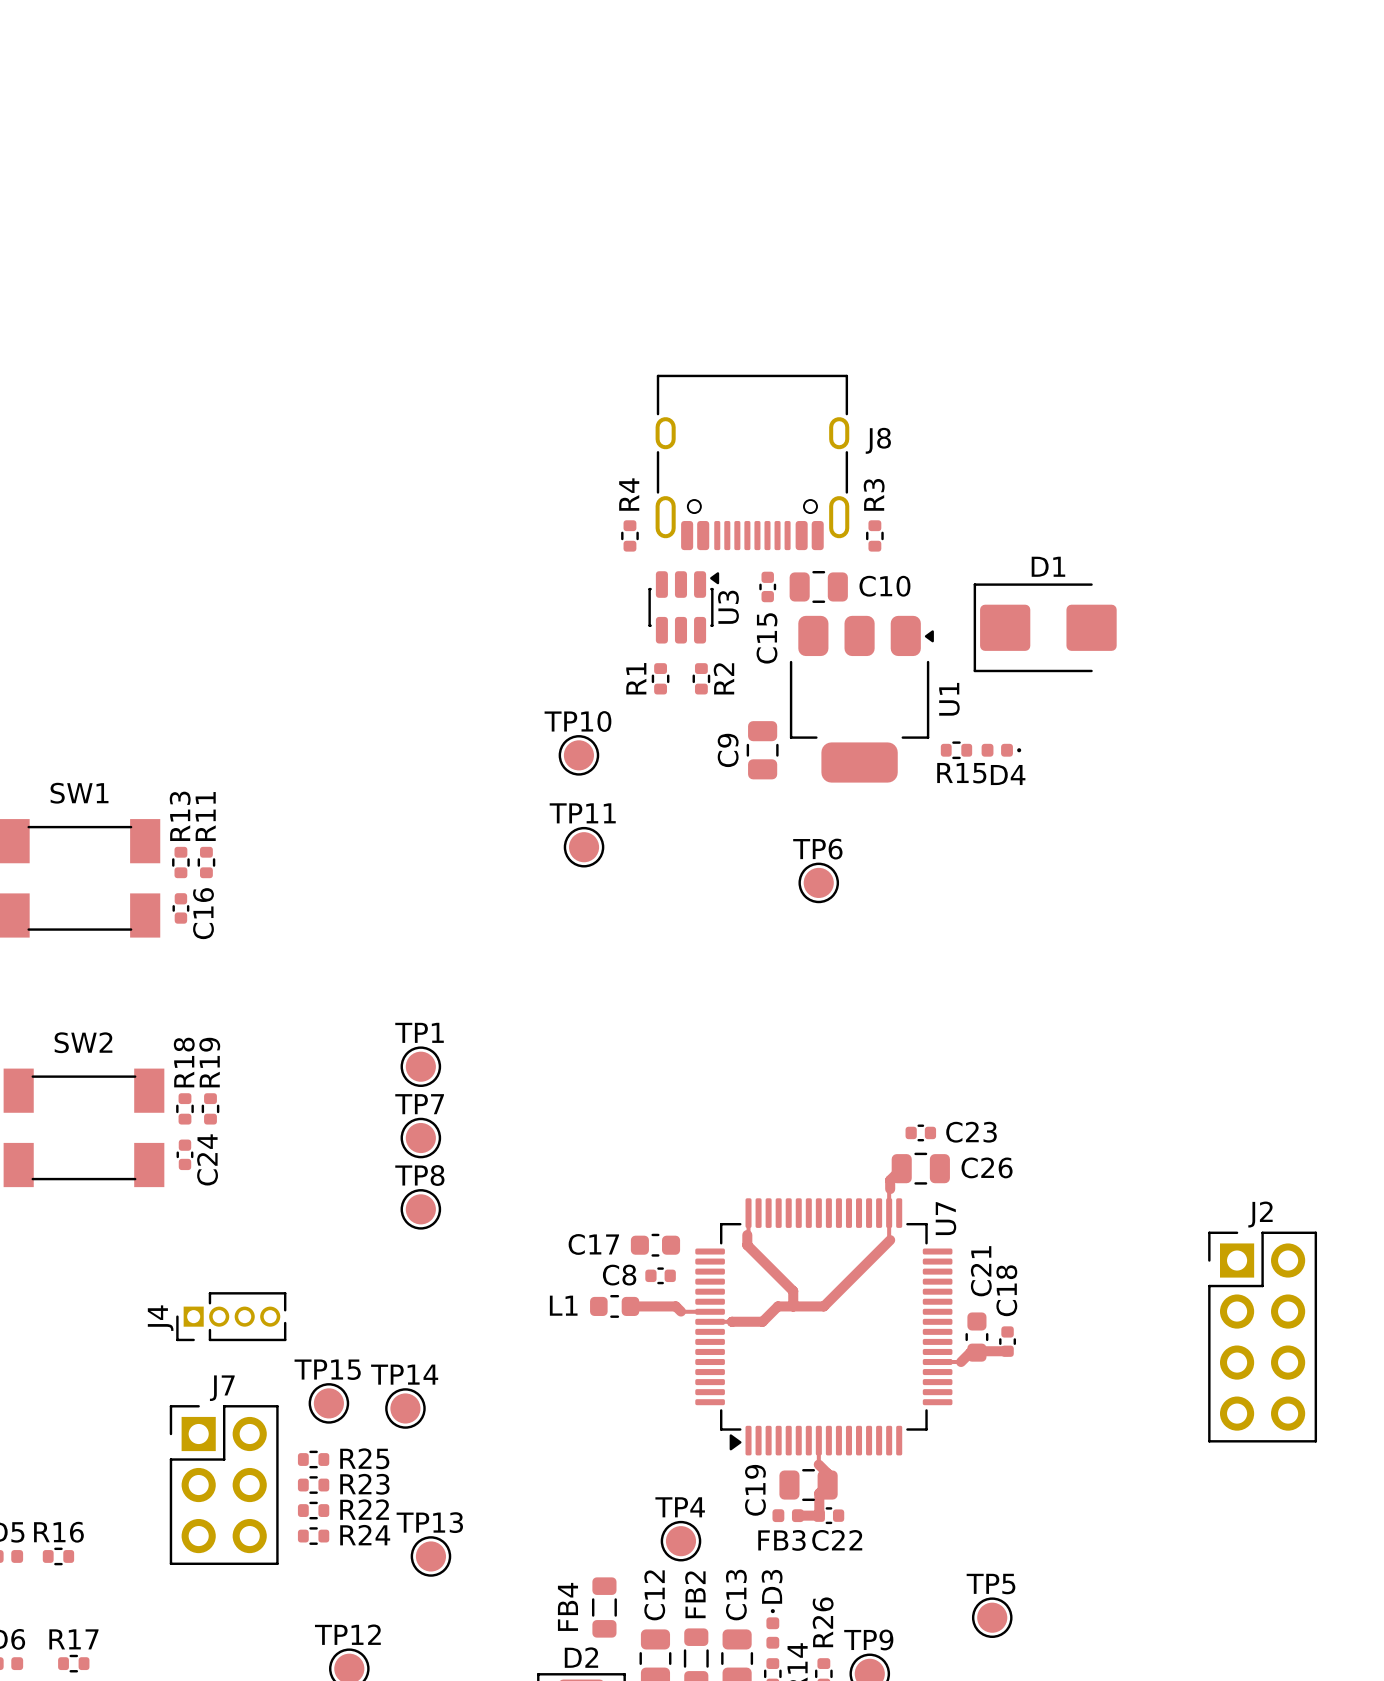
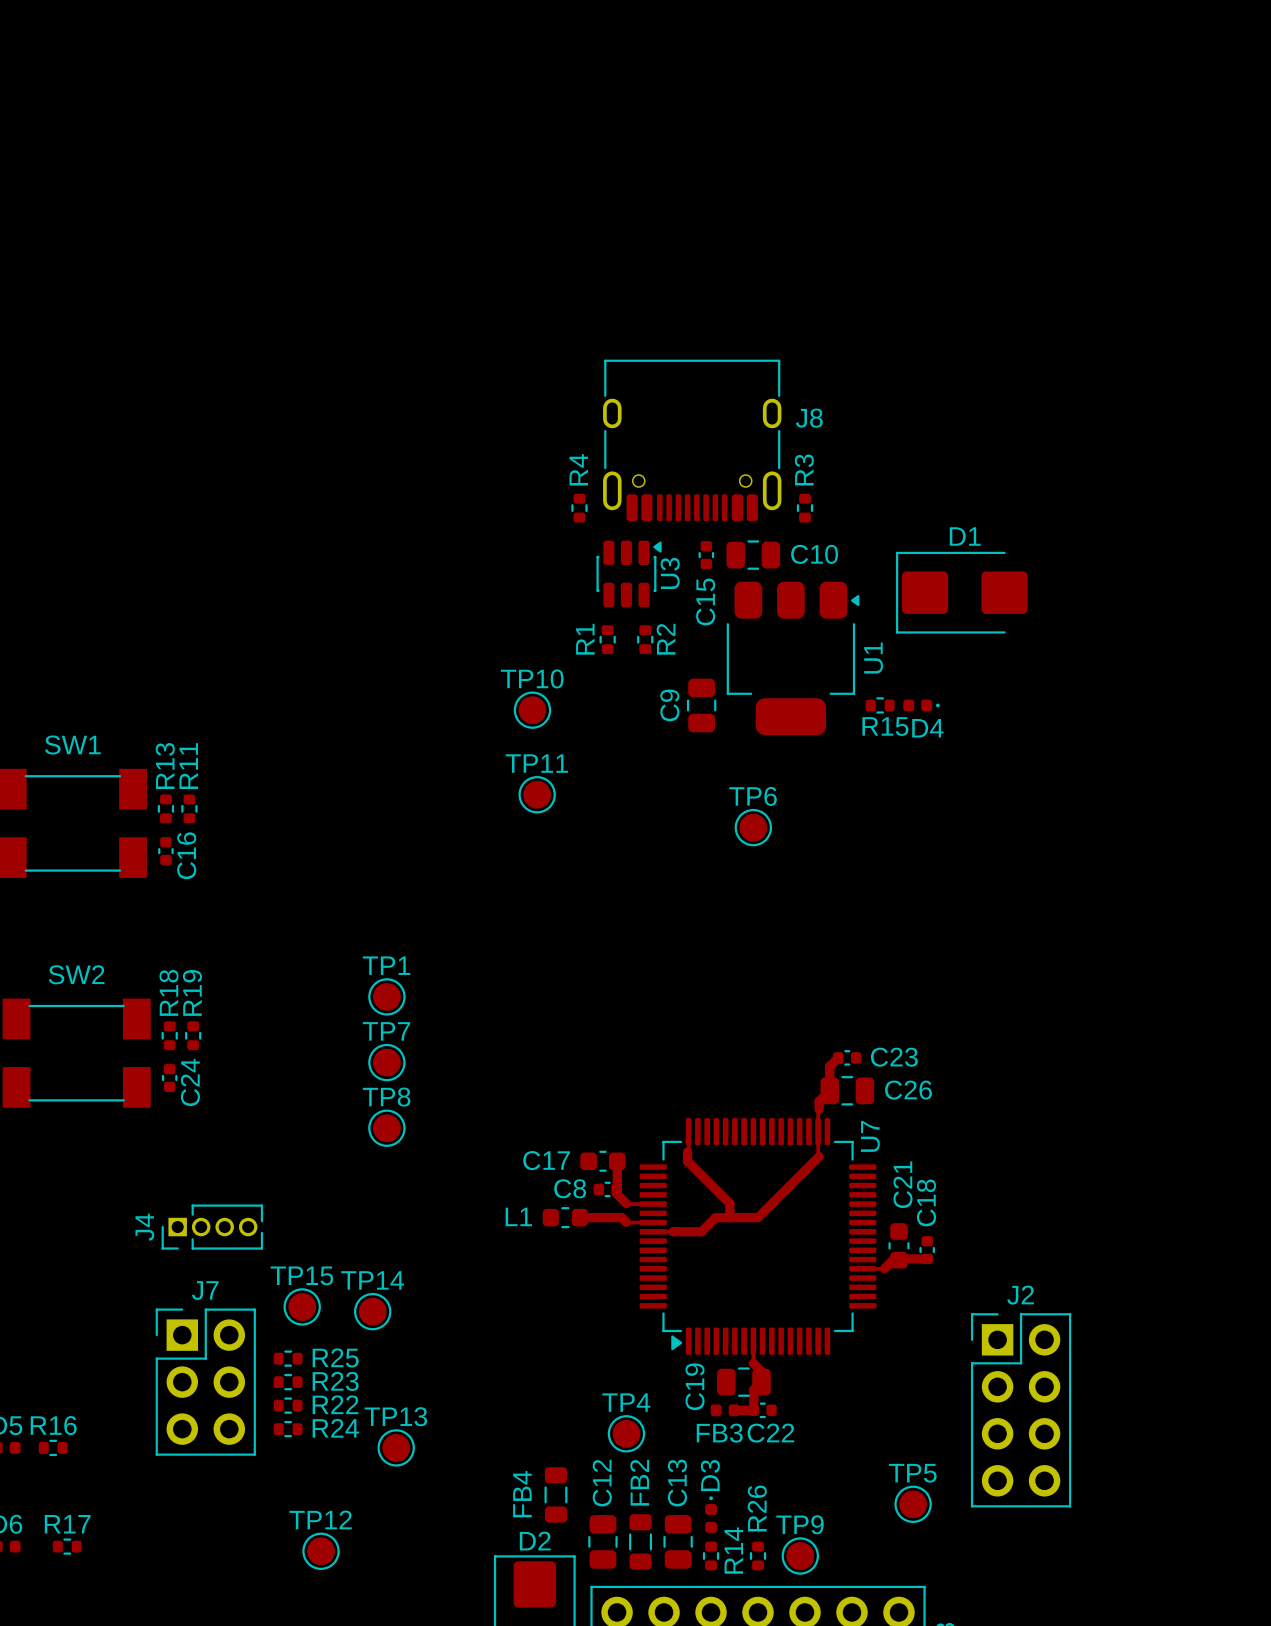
track: none -> (838, 1057) (829, 1066) (829, 1090)
track: none -> (617, 1161) (616, 1193) (626, 1204) (653, 1204)
J2 position: (1262, 1337) -> (1021, 1410)

